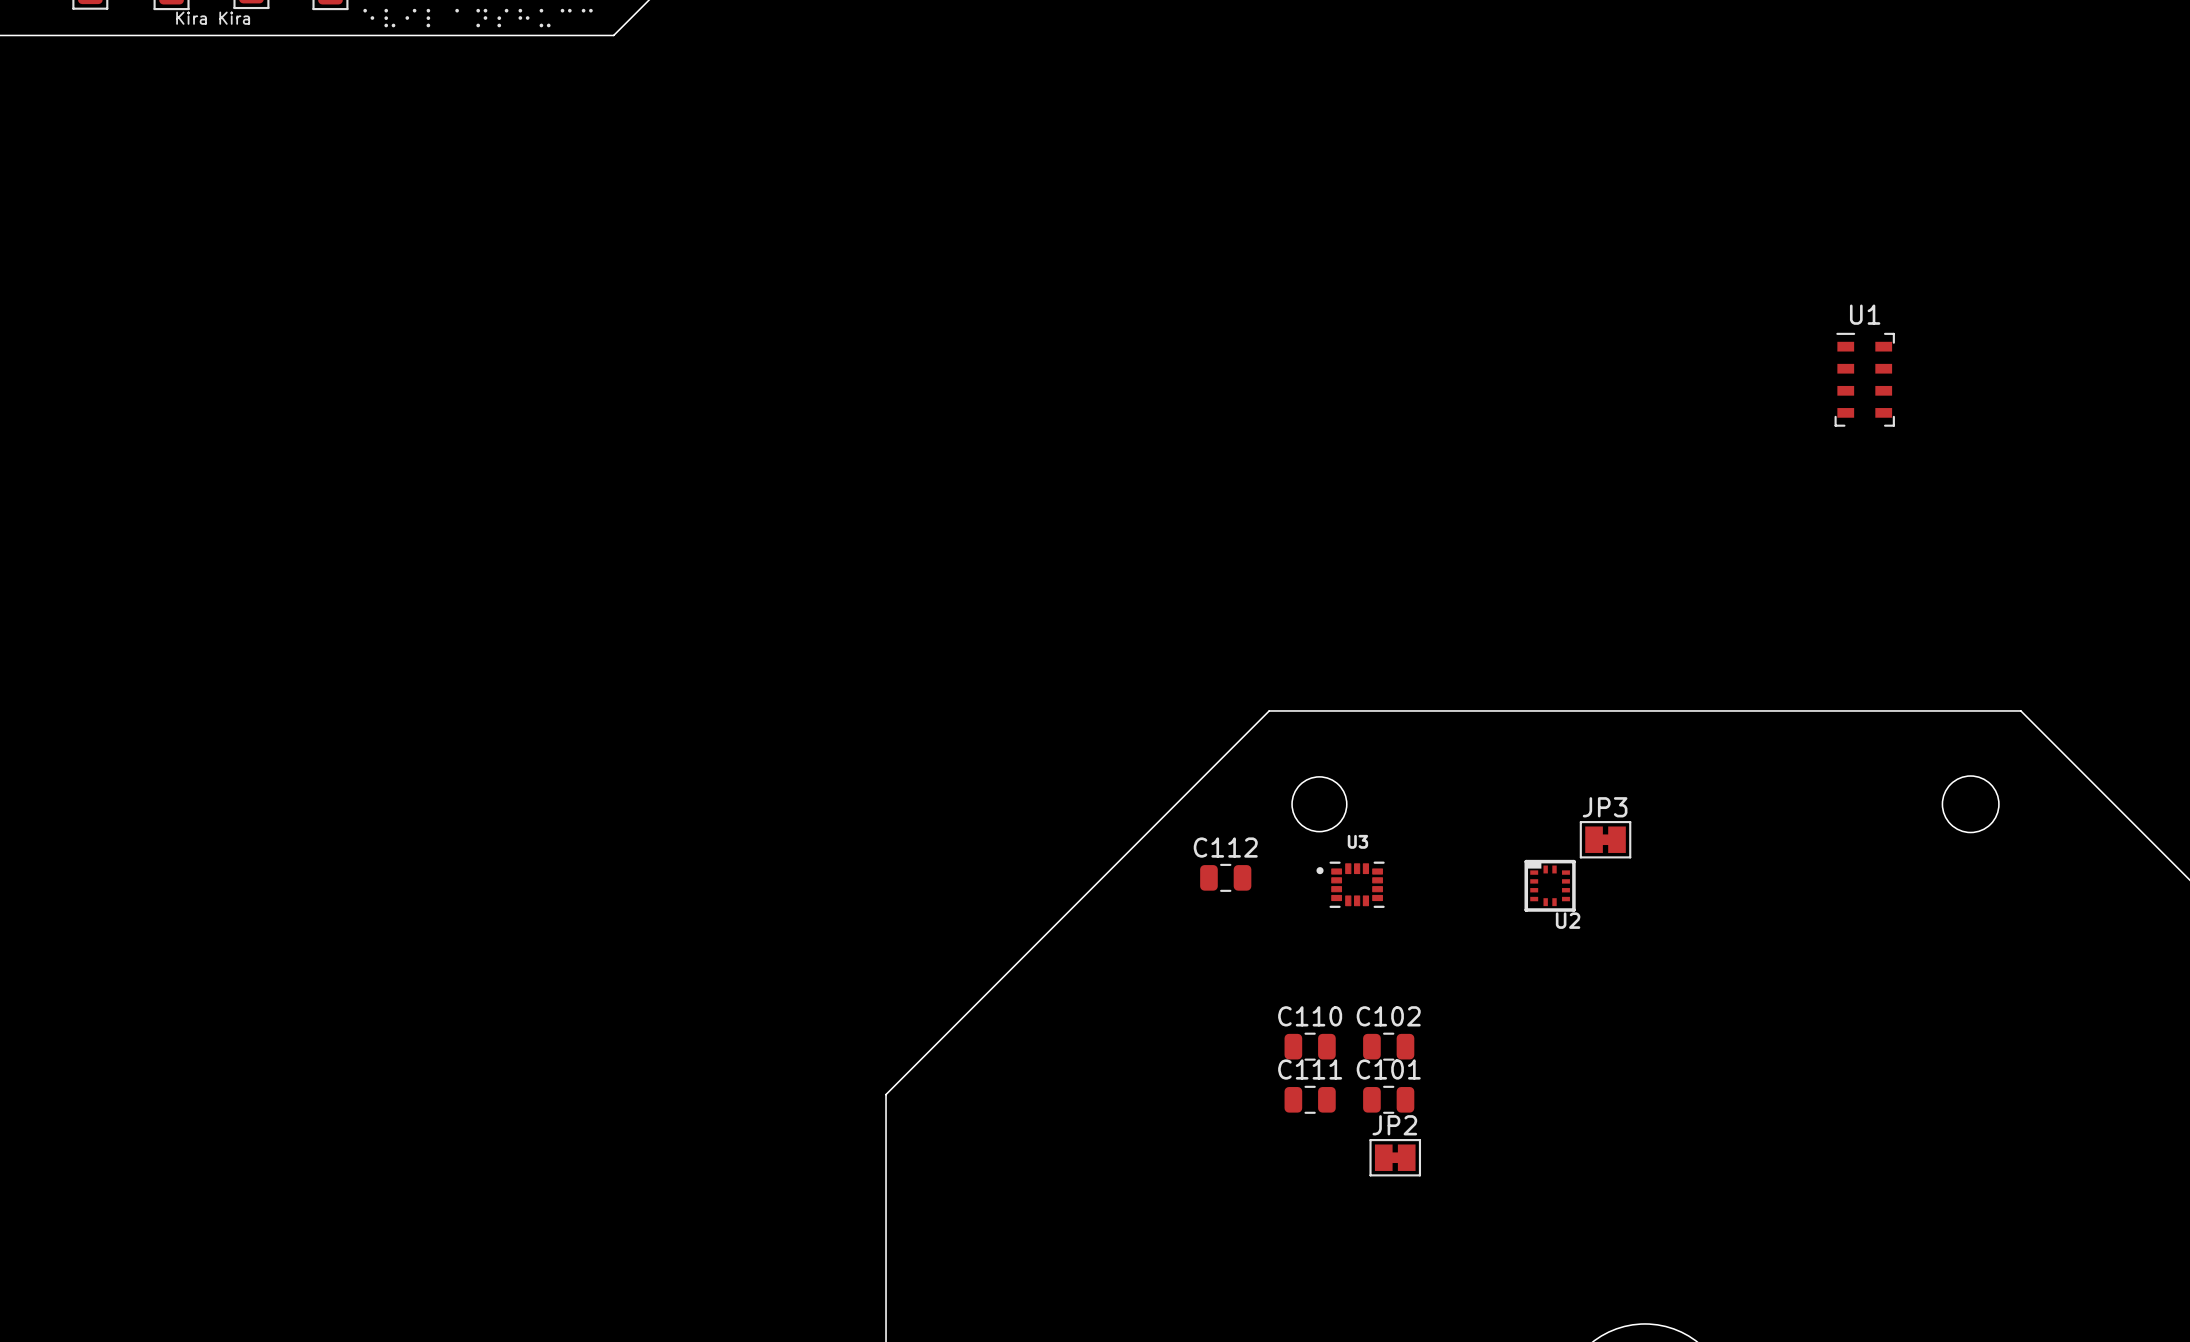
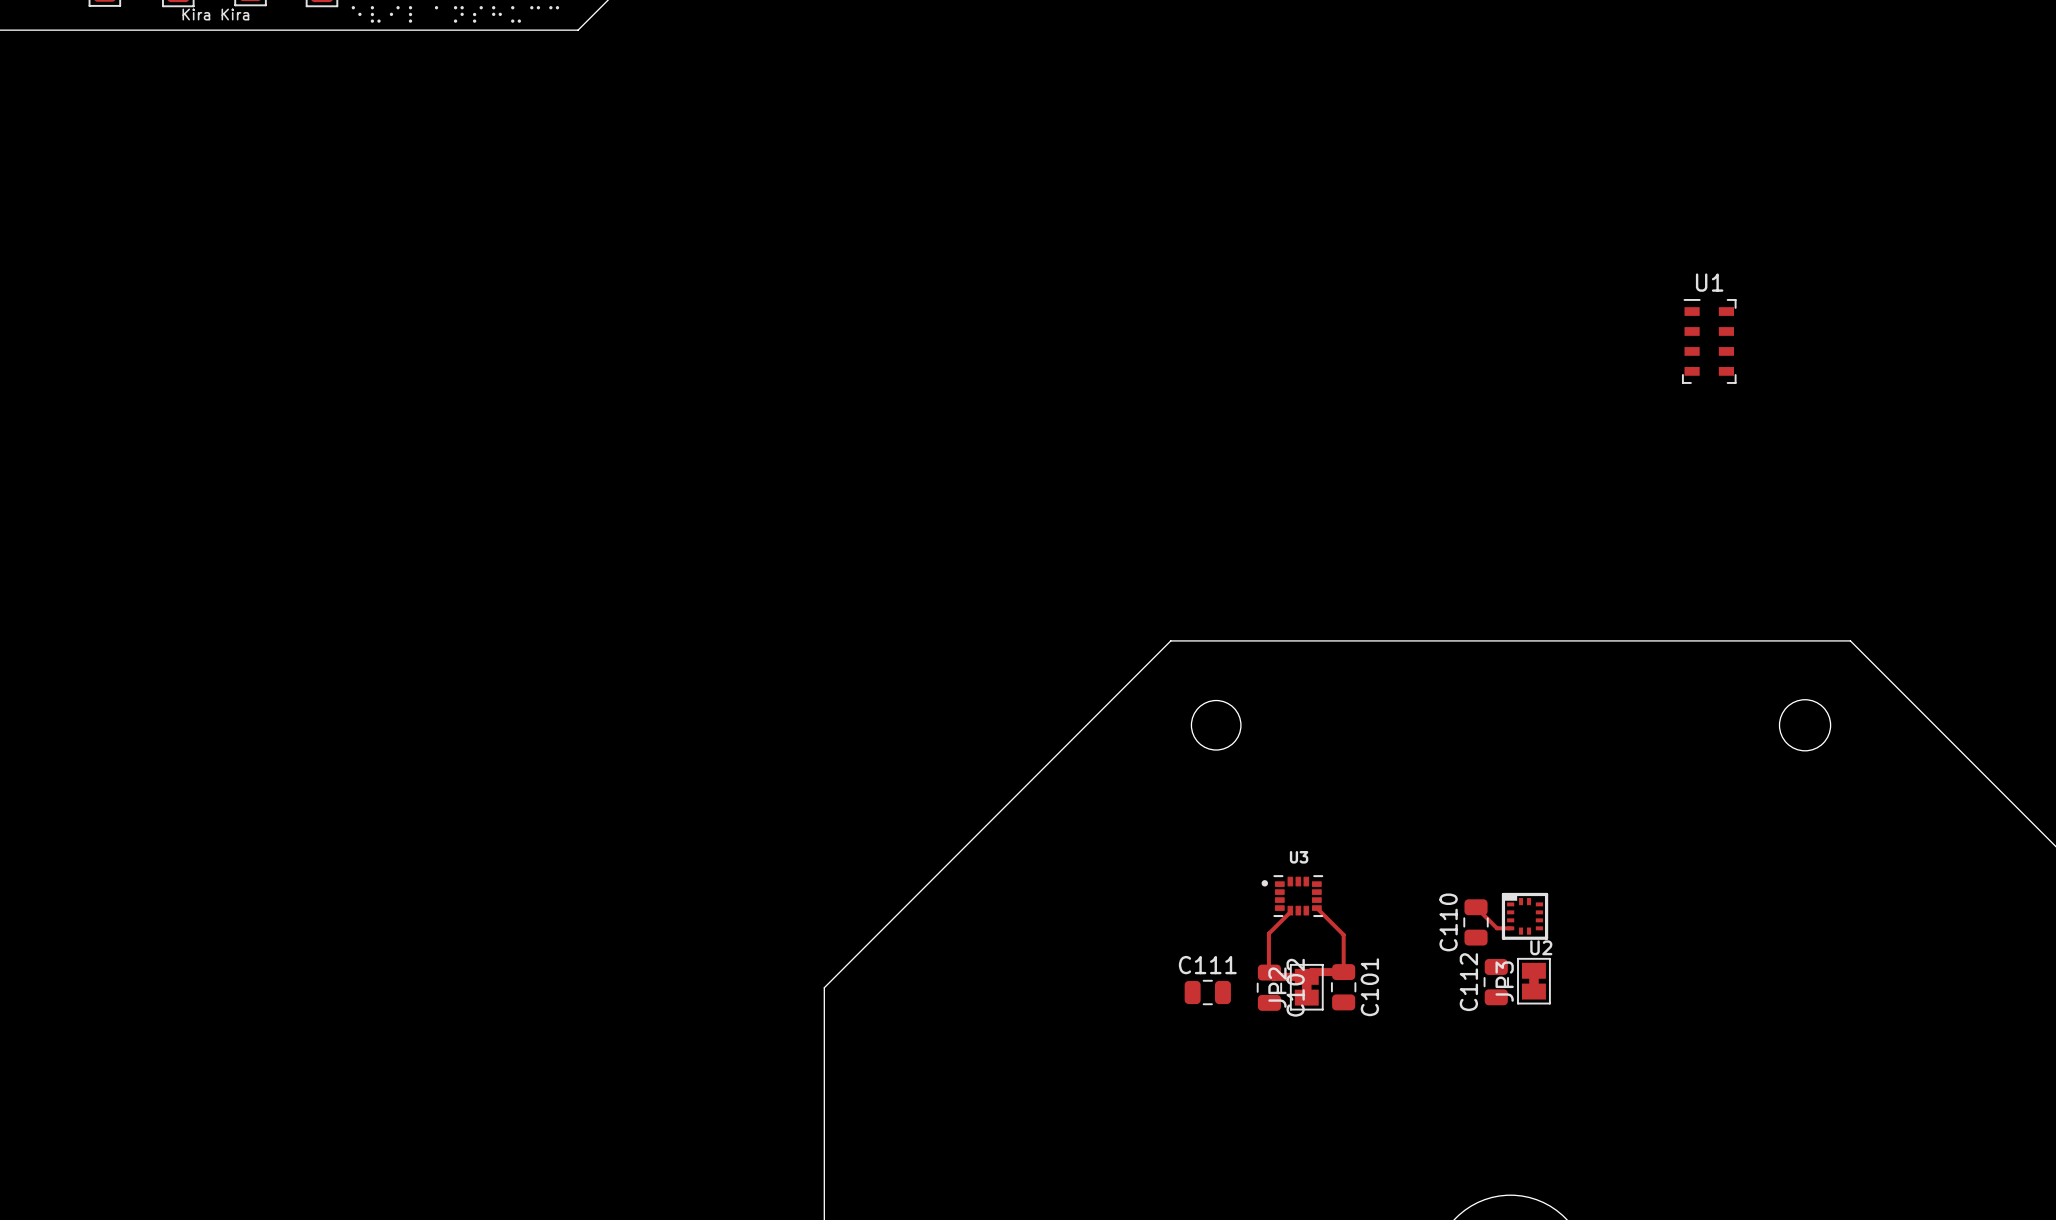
JP3 name position: JP3 (1605, 807) -> JP3 (1504, 981)
JP3 rotation: 0° (1605, 839) -> 90° clockwise (1533, 981)
JP3 position: (1605, 839) -> (1533, 981)
C112 name position: C112 (1225, 847) -> C112 (1468, 982)
C112 rotation: 0° (1225, 877) -> 90° clockwise (1496, 982)
C112 position: (1225, 877) -> (1496, 982)
U3 position: (1350, 884) -> (1292, 896)
U2 position: (1550, 885) -> (1525, 916)
top track: none -> (1476, 907) (1497, 928) (1510, 928)
top track: none -> (1316, 908) (1343, 934) (1343, 972) (1311, 972) (1306, 976) (1273, 976) (1268, 972) (1268, 933) (1290, 910)
C110 name position: C110 (1310, 1016) -> C110 (1448, 922)
C110 rotation: 0° (1310, 1046) -> 90° clockwise (1476, 922)
C110 position: (1310, 1046) -> (1476, 922)
C102 rotation: 0° (1388, 1046) -> 90° clockwise (1269, 987)
C102 position: (1388, 1046) -> (1269, 987)
C101 rotation: 0° (1388, 1099) -> 90° clockwise (1343, 987)
C101 position: (1388, 1099) -> (1343, 987)
JP2 name position: JP2 (1394, 1125) -> JP2 (1277, 987)
JP2 rotation: 0° (1395, 1157) -> 90° clockwise (1306, 987)
JP2 position: (1395, 1157) -> (1306, 987)

